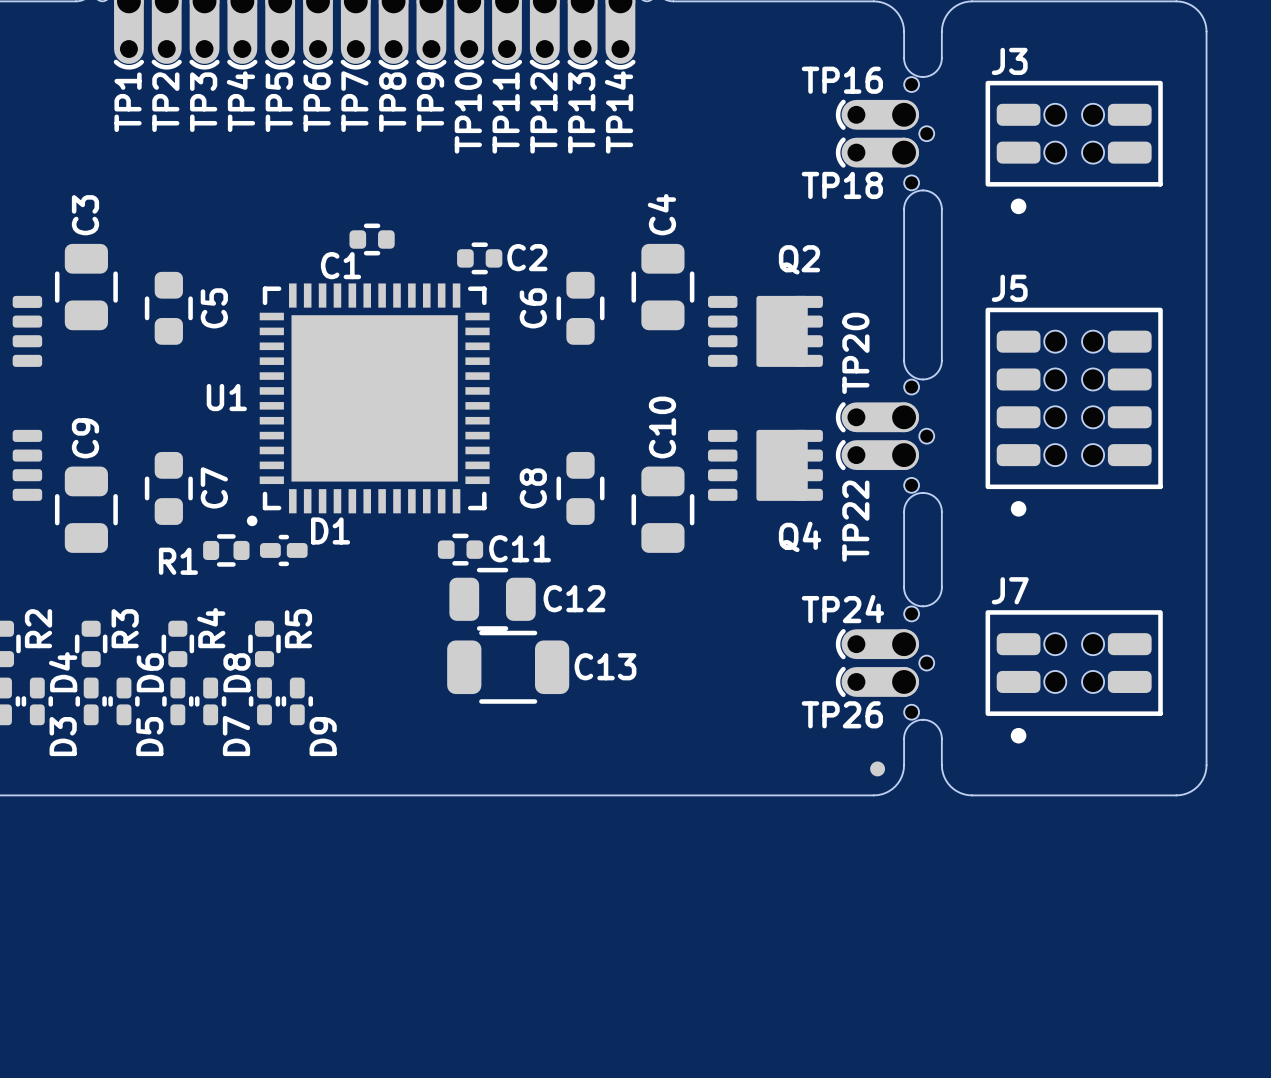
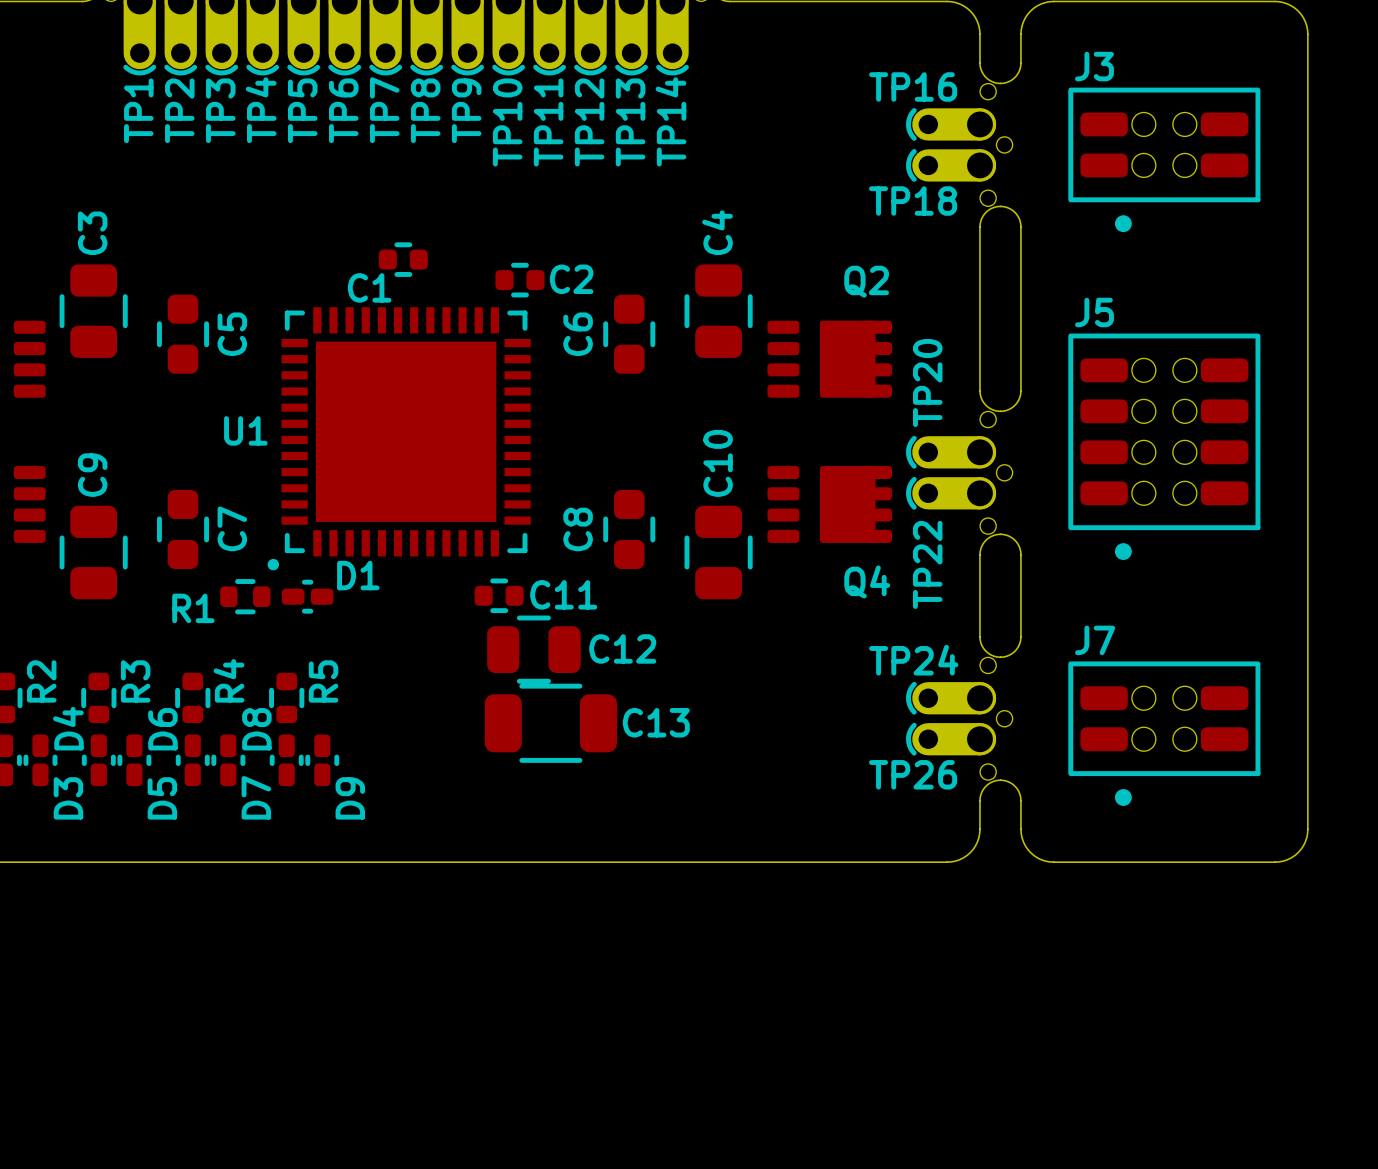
J3 footprint: [985, 80, 1163, 215] -> [1068, 87, 1261, 233]
J5 footprint: [985, 307, 1163, 517] -> [1068, 333, 1261, 560]
J7 footprint: [985, 610, 1163, 744] -> [1068, 661, 1261, 806]
part: (877, 768) -> none

